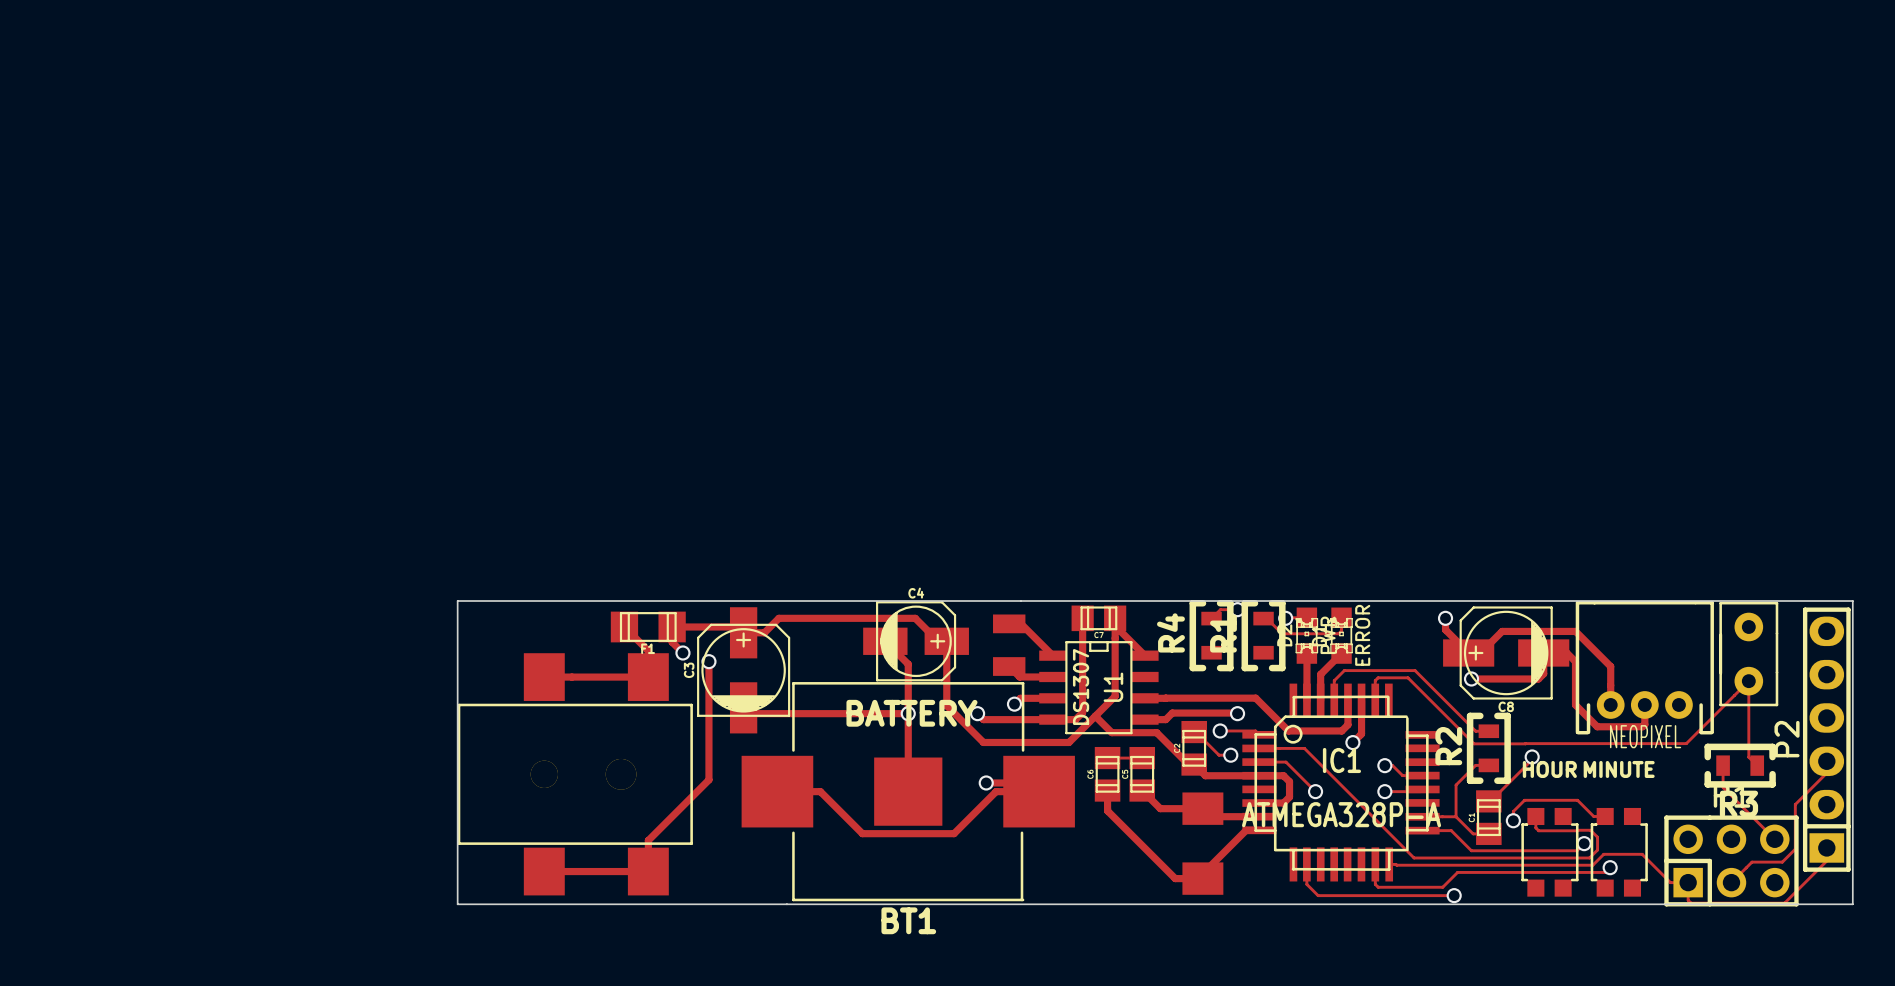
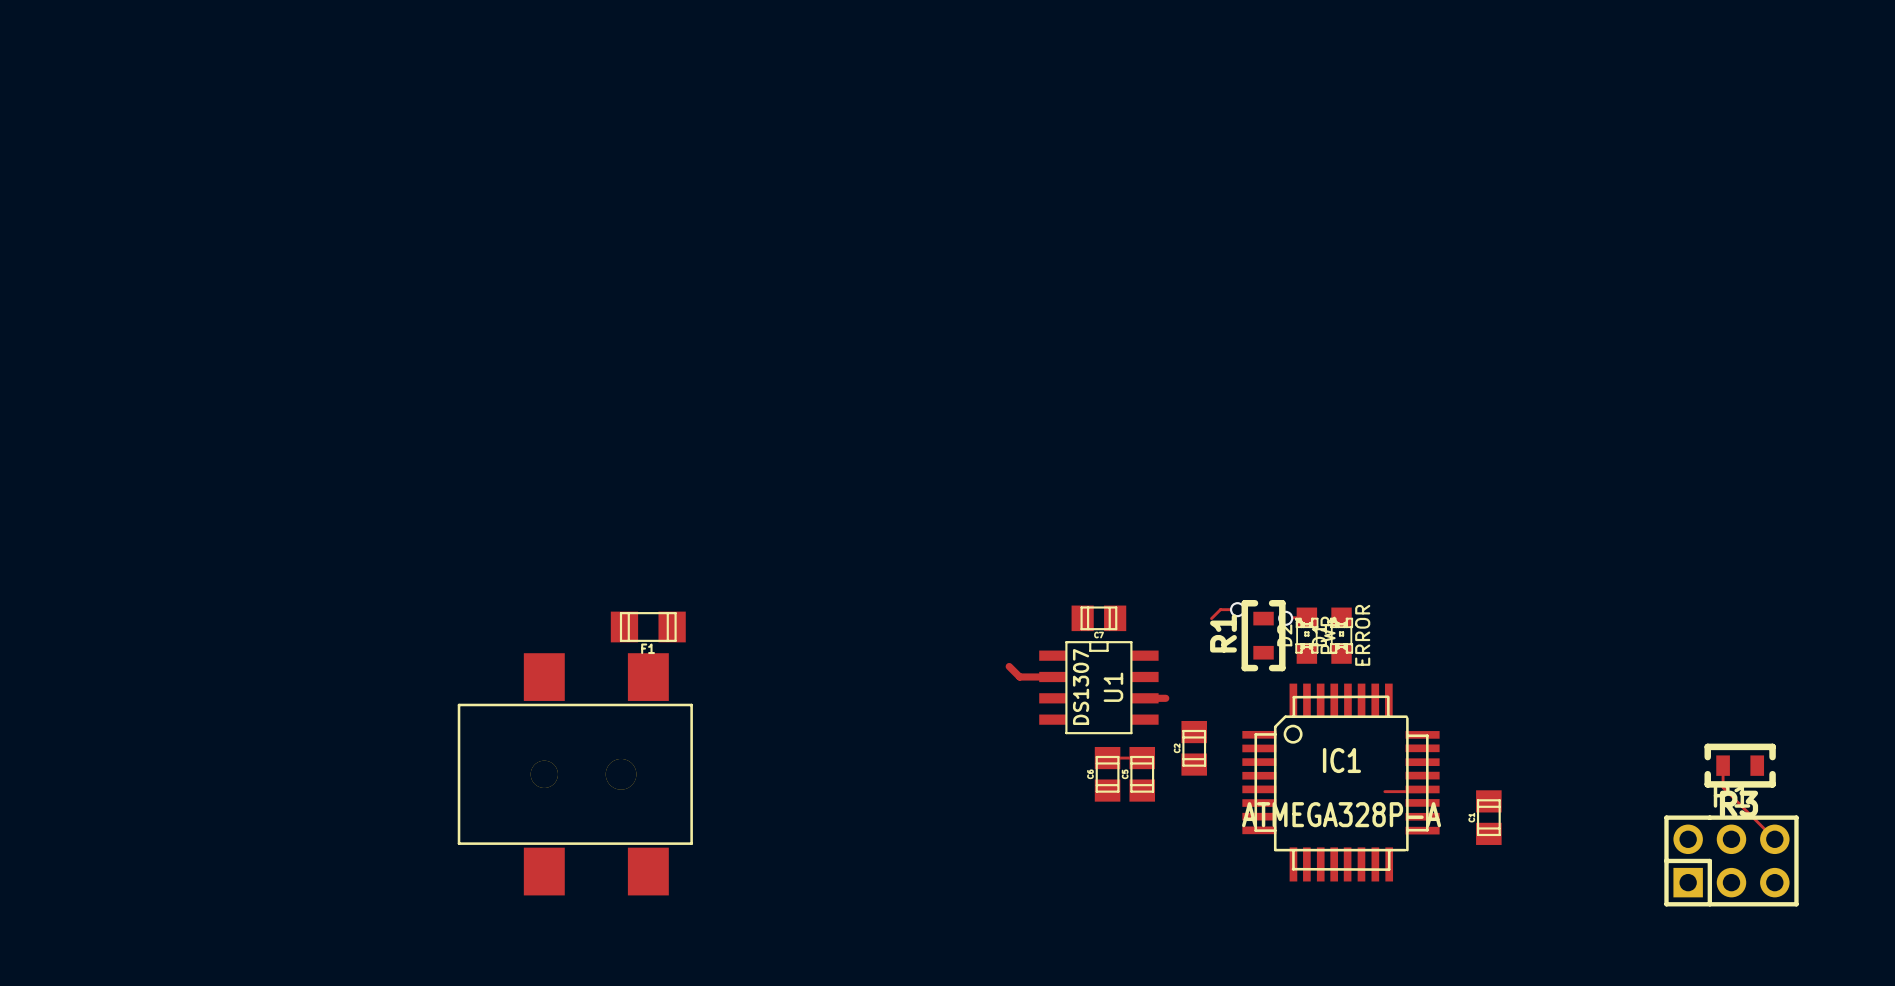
board edge: (457, 601) (1852, 601) (1852, 904) (457, 904) (457, 601) -> none
track: (1341, 617) (1341, 630) (1338, 633) (1282, 633) (1266, 618) (1263, 618) -> none
track: (1082, 618) (1082, 712) (1075, 719) (983, 719) (977, 713) -> none
track: (1115, 618) (1115, 696) (1069, 742) (983, 742) (946, 705) (946, 641) (938, 641) (915, 618) (778, 618) (764, 632) (743, 632) (737, 626) (672, 626) (672, 642) (682, 652) -> none
track: (1445, 618) (1445, 629) (1468, 652) (1480, 652) (1502, 631) (1575, 631) (1610, 666) (1610, 704) -> none
via: (1445, 618) -> none
track: (1009, 623) (1021, 623) (1052, 655) -> none
track: (1115, 625) (1144, 655) -> none
track: (624, 626) (648, 650) (648, 677) (544, 677) -> none
R4: (1211, 635) -> none
track: (885, 641) (908, 664) (908, 791) -> none
C4: (916, 641) -> none
part: (1009, 645) -> none
via: (682, 652) -> none
C8: (1506, 652) -> none
track: (1306, 653) (1306, 700) -> none
track: (1341, 653) (1320, 674) (1320, 700) -> none
part: (1748, 654) -> none
track: (708, 661) (708, 779) (648, 840) (648, 871) (544, 871) -> none
via: (708, 661) -> none
part: NEOPIXEL (1644, 667) -> none
C3: (743, 670) -> none
track: (1471, 678) (1538, 678) (1543, 673) (1543, 652) (1566, 652) (1575, 661) (1575, 704) (1597, 726) (1642, 726) (1644, 724) (1644, 704) -> none
via: (1471, 678) -> none
track: (1052, 698) (1020, 698) (1014, 704) -> none
track: (1165, 698) (1255, 698) (1288, 730) (1341, 730) (1347, 724) (1347, 700) -> none
track: (1334, 700) (1334, 680) (1344, 670) (1415, 670) (1475, 731) (1488, 731) -> none
track: (1361, 700) (1361, 733) (1352, 742) -> none
track: (1375, 700) (1375, 680) (1378, 677) (1407, 677) (1474, 743) (1525, 743) -> none
via: (1014, 704) -> none
track: (743, 707) (749, 713) (908, 713) -> none
via: (908, 713) -> none
via: (977, 713) -> none
track: (1237, 713) (1172, 713) (1165, 719) (1144, 719) -> none
via: (1237, 713) -> none
track: (1095, 716) (1111, 732) (1156, 732) (1188, 764) (1194, 764) (1205, 775) (1283, 775) (1289, 781) (1289, 797) (1283, 803) (1259, 803) -> none
track: (1220, 730) (1255, 730) (1259, 734) -> none
via: (1220, 730) -> none
track: (1194, 732) (1219, 755) (1230, 755) -> none
P2: (1826, 739) -> none
via: (1352, 742) -> none
track: (1525, 743) (1686, 743) (1748, 681) (1748, 757) (1757, 765) -> none
track: (1259, 748) (1304, 748) (1414, 857) (1589, 857) (1597, 850) (1597, 837) (1590, 830) (1538, 830) (1535, 827) (1535, 816) -> none
R2: (1488, 748) -> none
via: (1230, 755) -> none
track: (1532, 756) (1532, 759) (1488, 801) -> none
via: (1532, 756) -> none
track: (1826, 761) (1826, 773) (1795, 804) (1795, 849) (1782, 862) (1752, 862) (1731, 882) -> none
track: (1259, 762) (1285, 762) (1315, 791) -> none
track: (1384, 765) (1392, 765) (1402, 775) (1422, 775) -> none
via: (1384, 765) -> none
track: (1488, 765) (1475, 765) (1456, 785) (1456, 816) -> none
track: (986, 782) (1030, 782) (1039, 791) (996, 791) (954, 833) (862, 833) (820, 791) (777, 791) -> none
via: (986, 782) -> none
track: (1107, 790) (1107, 810) (1175, 878) (1202, 878) (1202, 873) (1246, 830) (1259, 830) -> none
track: (1142, 790) (1160, 808) (1202, 808) (1210, 816) (1259, 816) -> none
BT1: BATTERY (908, 791) -> none
via: (1315, 791) -> none
via: (1384, 791) -> none
track: (1422, 816) (1456, 816) -> none
track: (1456, 816) (1473, 833) (1488, 833) -> none
track: (1605, 816) (1593, 816) (1577, 800) (1524, 800) (1513, 811) (1513, 820) -> none
via: (1513, 820) -> none
track: (1422, 830) (1451, 830) (1471, 850) (1577, 850) (1584, 843) -> none
part: (1202, 843) -> none
via: (1584, 843) -> none
track: (1826, 847) (1826, 860) (1784, 903) (1691, 903) (1688, 900) (1688, 882) (1670, 882) (1642, 854) (1603, 854) (1592, 865) (1389, 864) -> none
part: HOUR (1549, 852) -> none
part: MINUTE (1619, 852) -> none
track: (1306, 864) (1306, 884) (1318, 895) (1454, 895) -> none
track: (1375, 864) (1375, 884) (1378, 887) (1442, 887) (1457, 872) (1605, 872) (1610, 867) -> none
via: (1610, 867) -> none
via: (1454, 895) -> none

